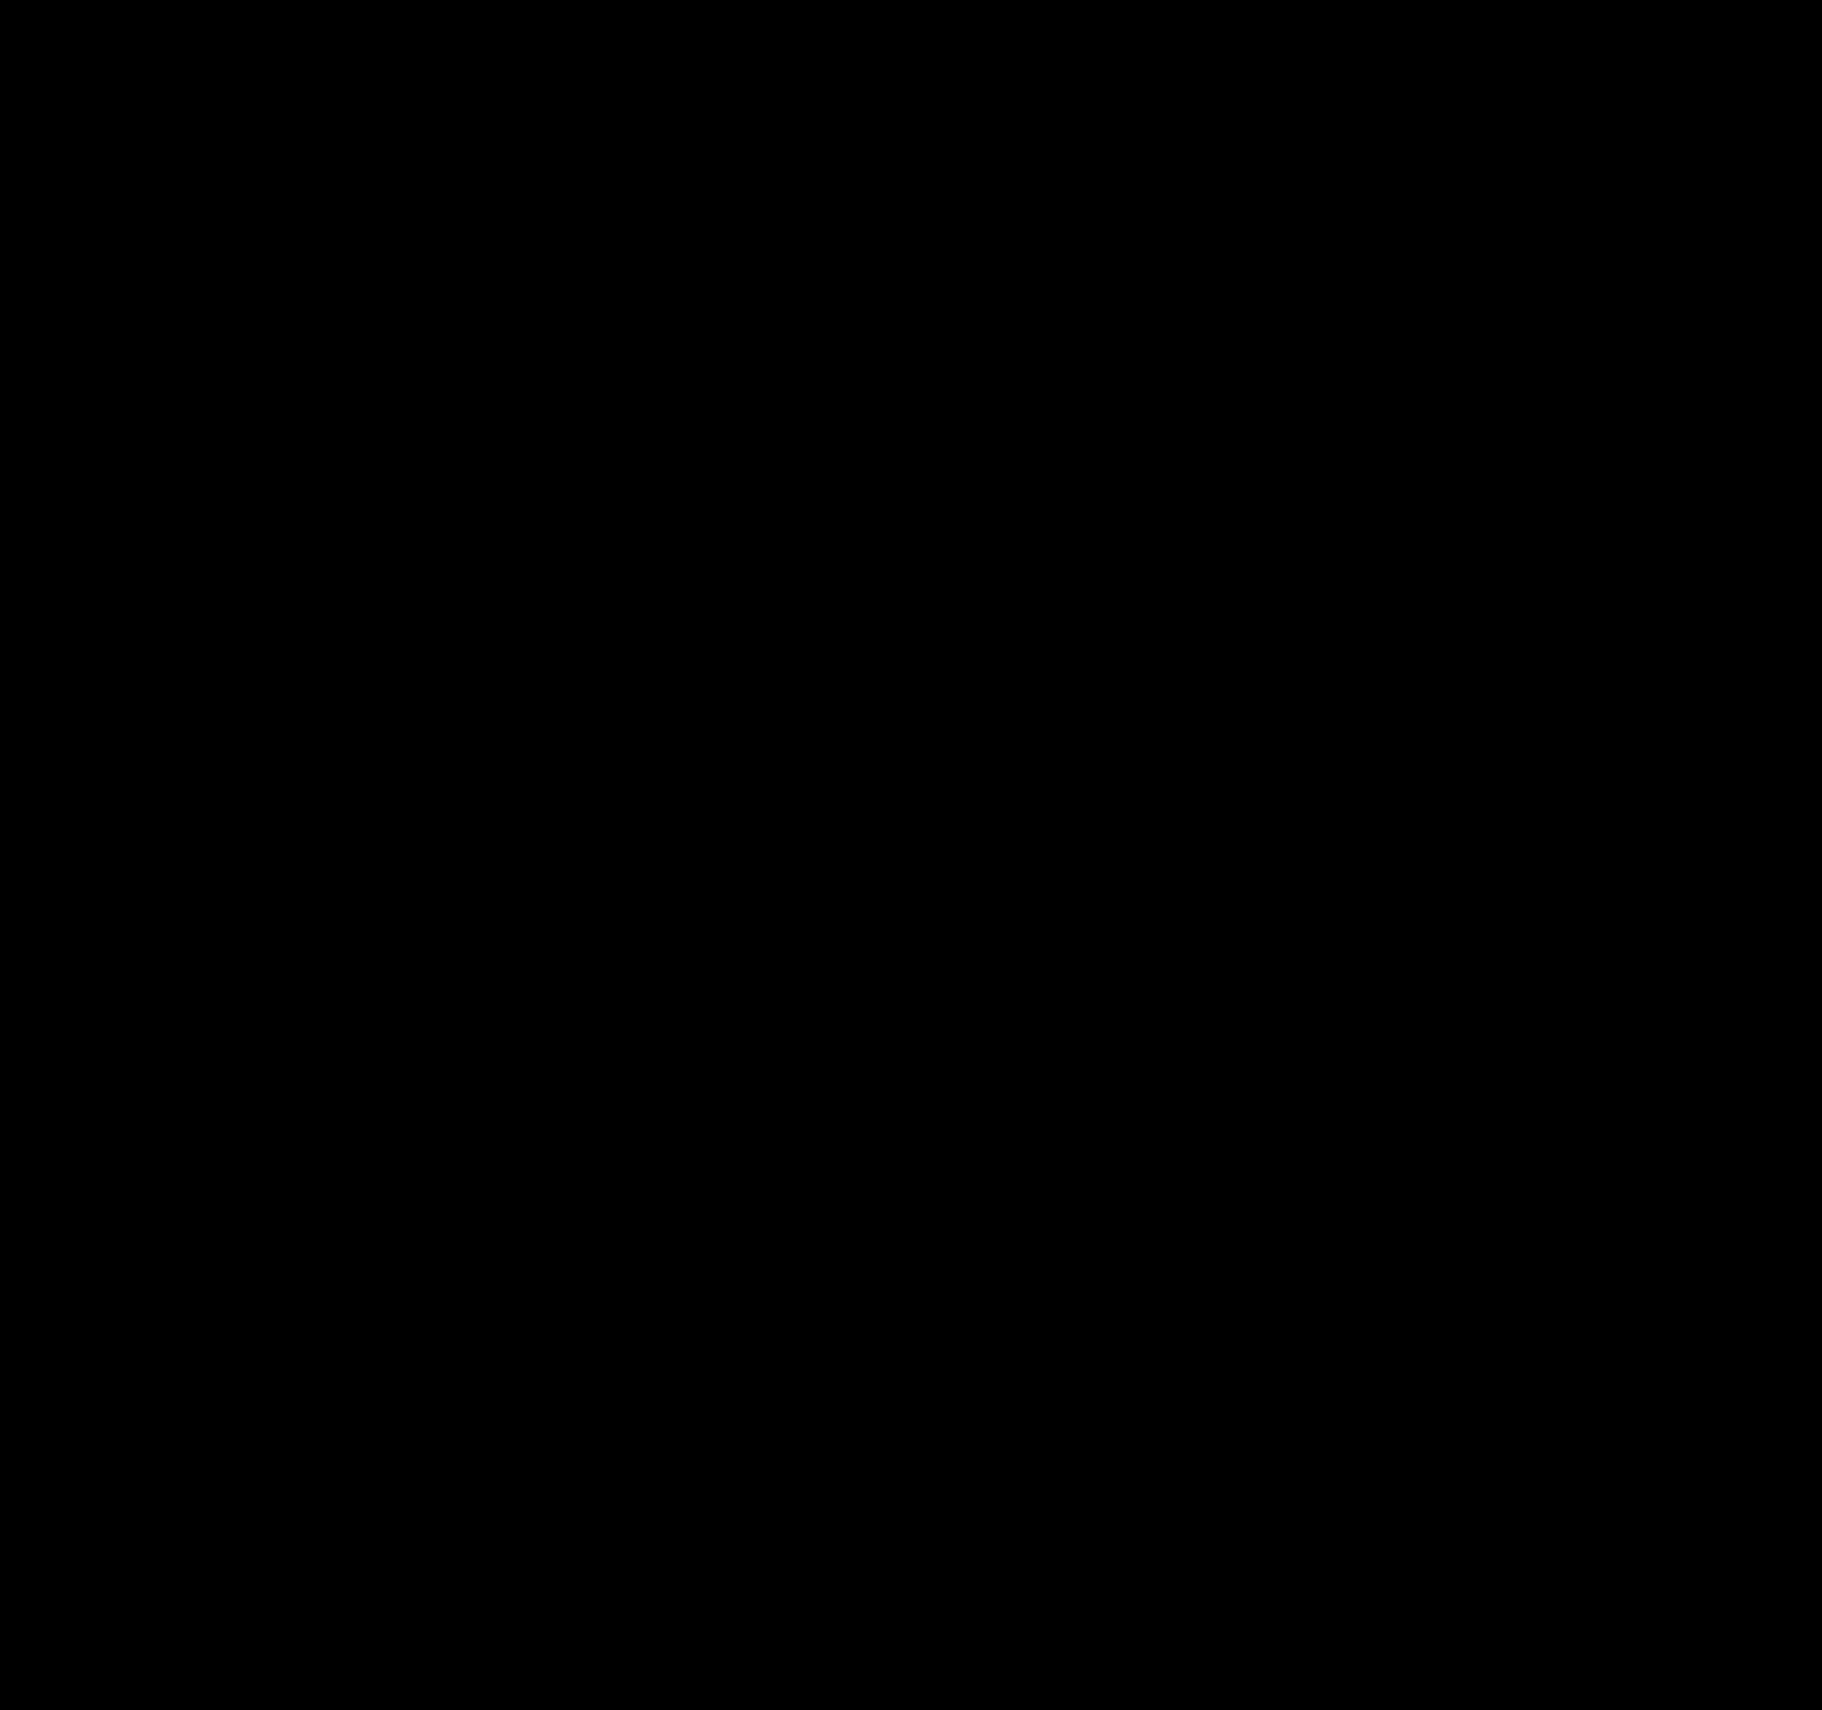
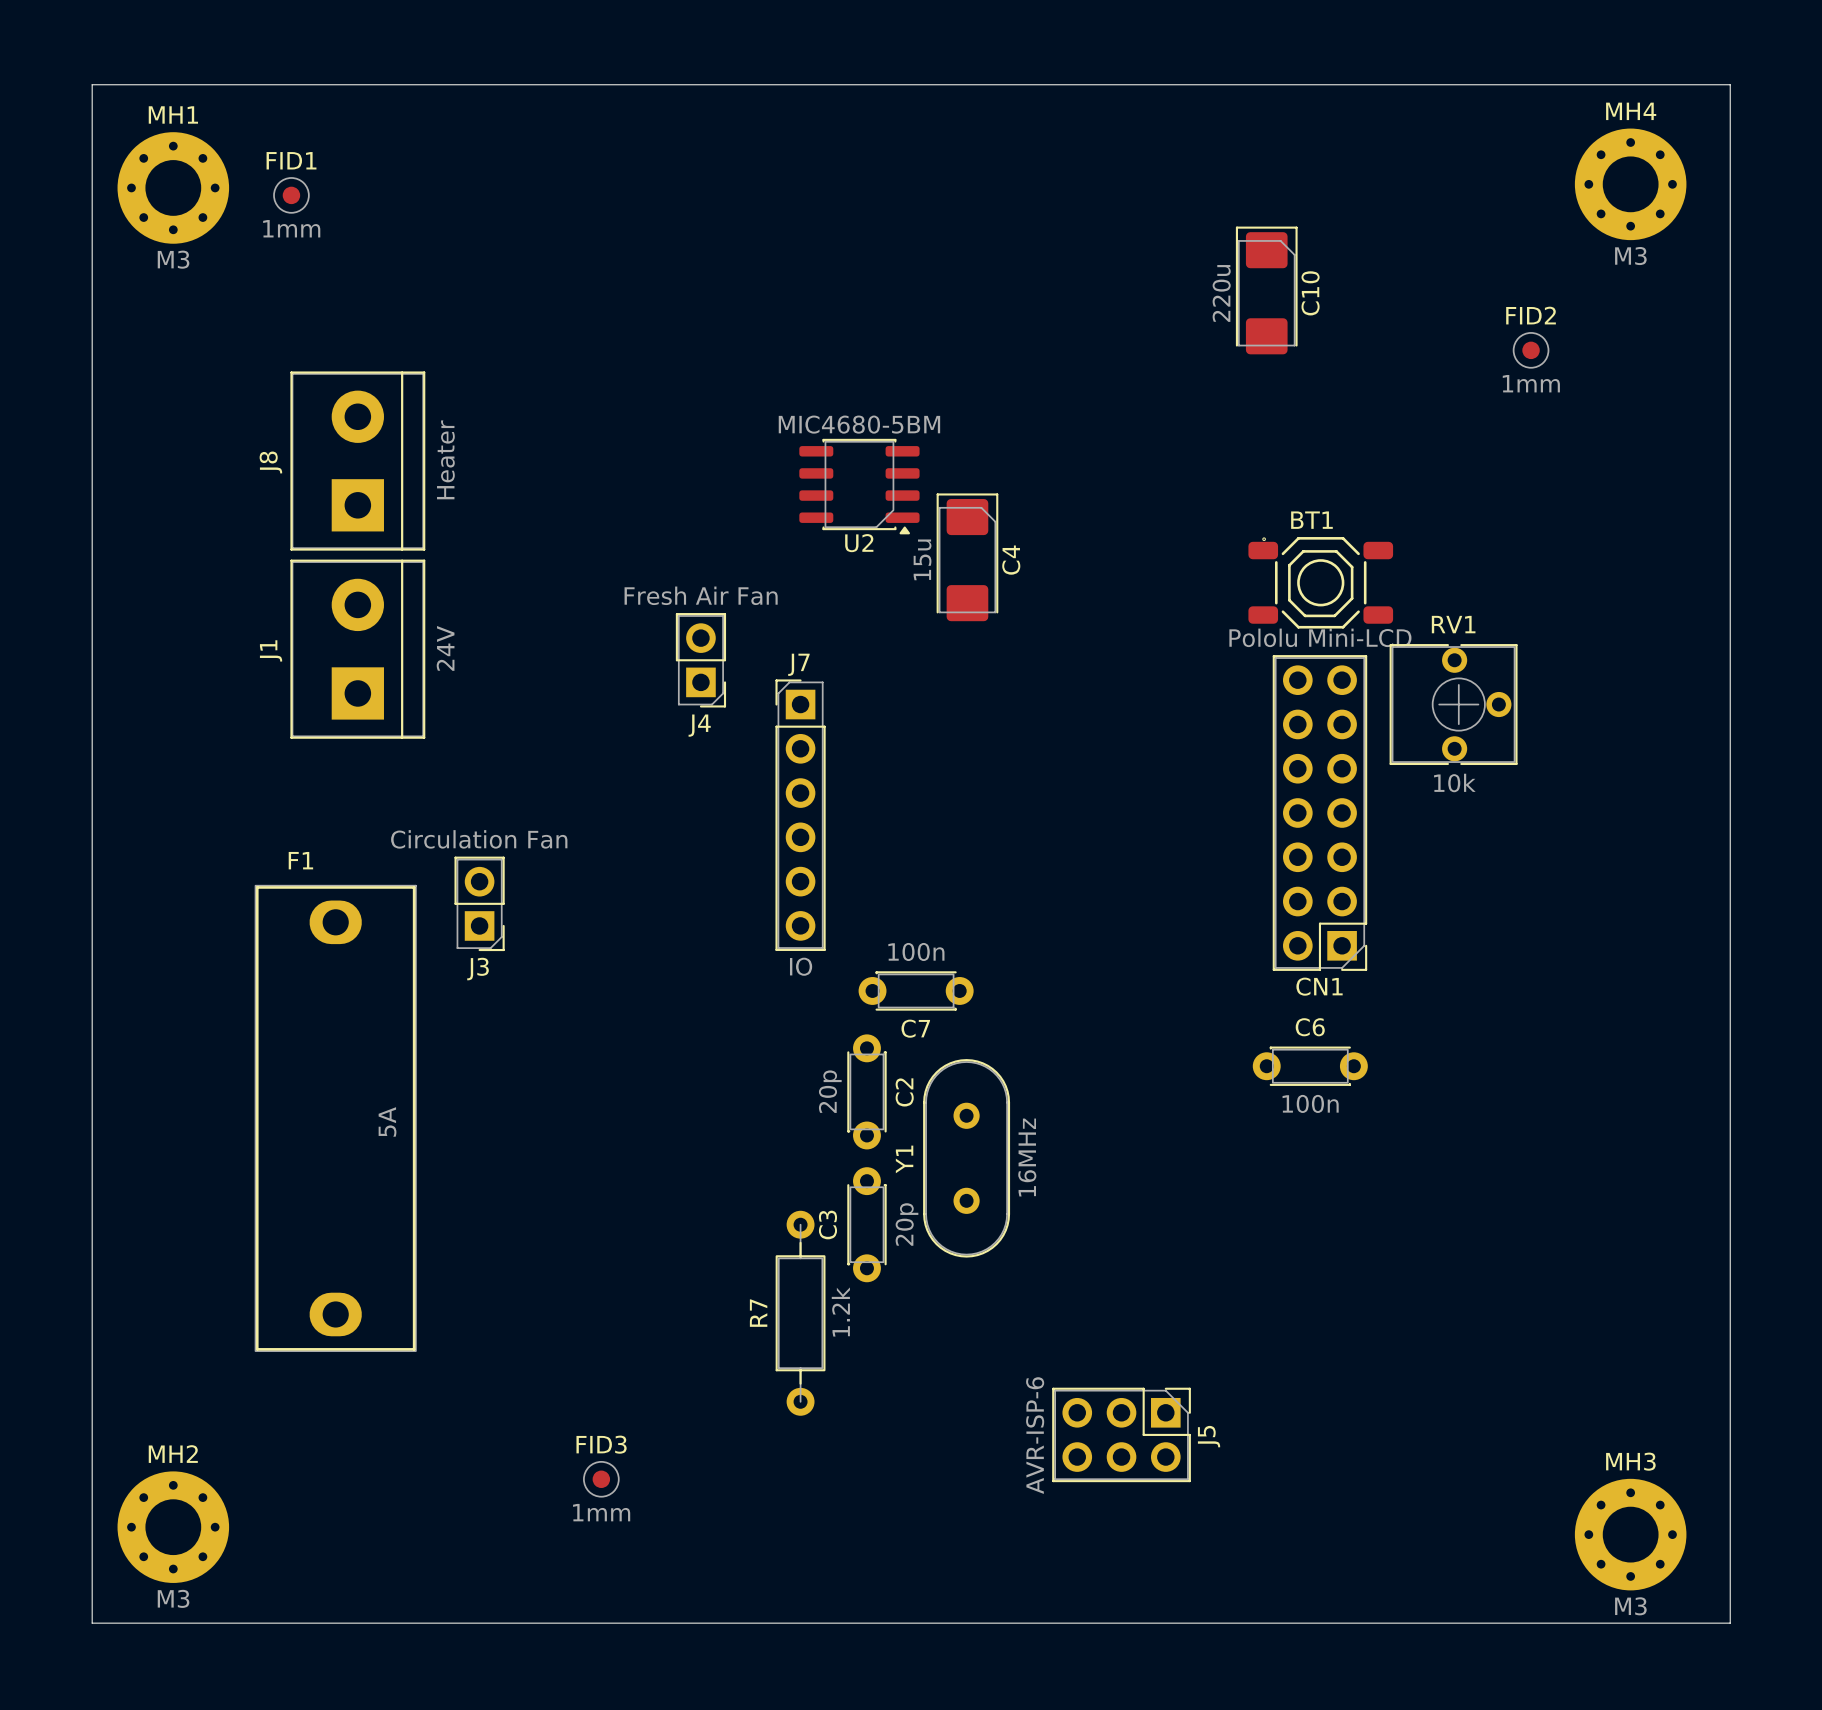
board edge: none -> (92, 84) (1730, 84) (1730, 1623) (92, 1623) (92, 84)
MH4: none -> M3 (1630, 184)
MH1: none -> M3 (173, 187)
FID1: none -> 1mm (291, 195)
C10: none -> 220u (1266, 290)
FID2: none -> 1mm (1531, 350)
J8: none -> Heater (357, 461)
U2: none -> MIC4680-5BM (859, 486)
C4: none -> 15u (967, 557)
BT1: none -> (1320, 582)
J1: none -> 24V (357, 649)
J4: none -> Fresh Air Fan (700, 660)
RV1: none -> 10k (1453, 704)
CN1: none -> Pololu Mini-LCD (1319, 812)
J7: none -> IO (800, 815)
J3: none -> Circulation Fan (479, 903)
C7: none -> 100n (916, 990)
C6: none -> 100n (1310, 1066)
C2: none -> 20p (866, 1091)
F1: none -> 5A (335, 1118)
Y1: none -> 16MHz (966, 1158)
C3: none -> 20p (866, 1224)
R7: none -> 1.2k (800, 1313)
J5: none -> AVR-ISP-6 (1121, 1434)
FID3: none -> 1mm (601, 1479)
MH2: none -> M3 (173, 1527)
MH3: none -> M3 (1630, 1534)

